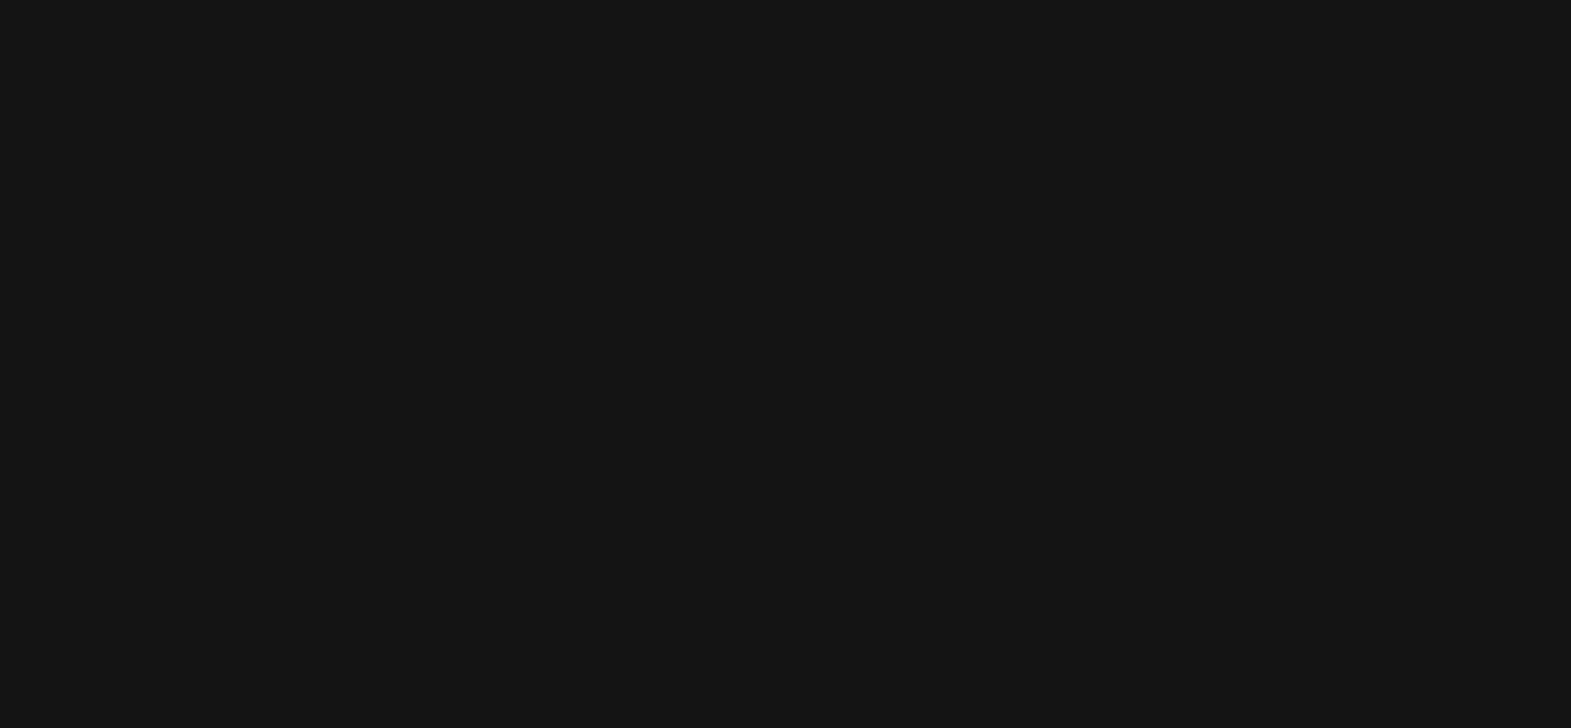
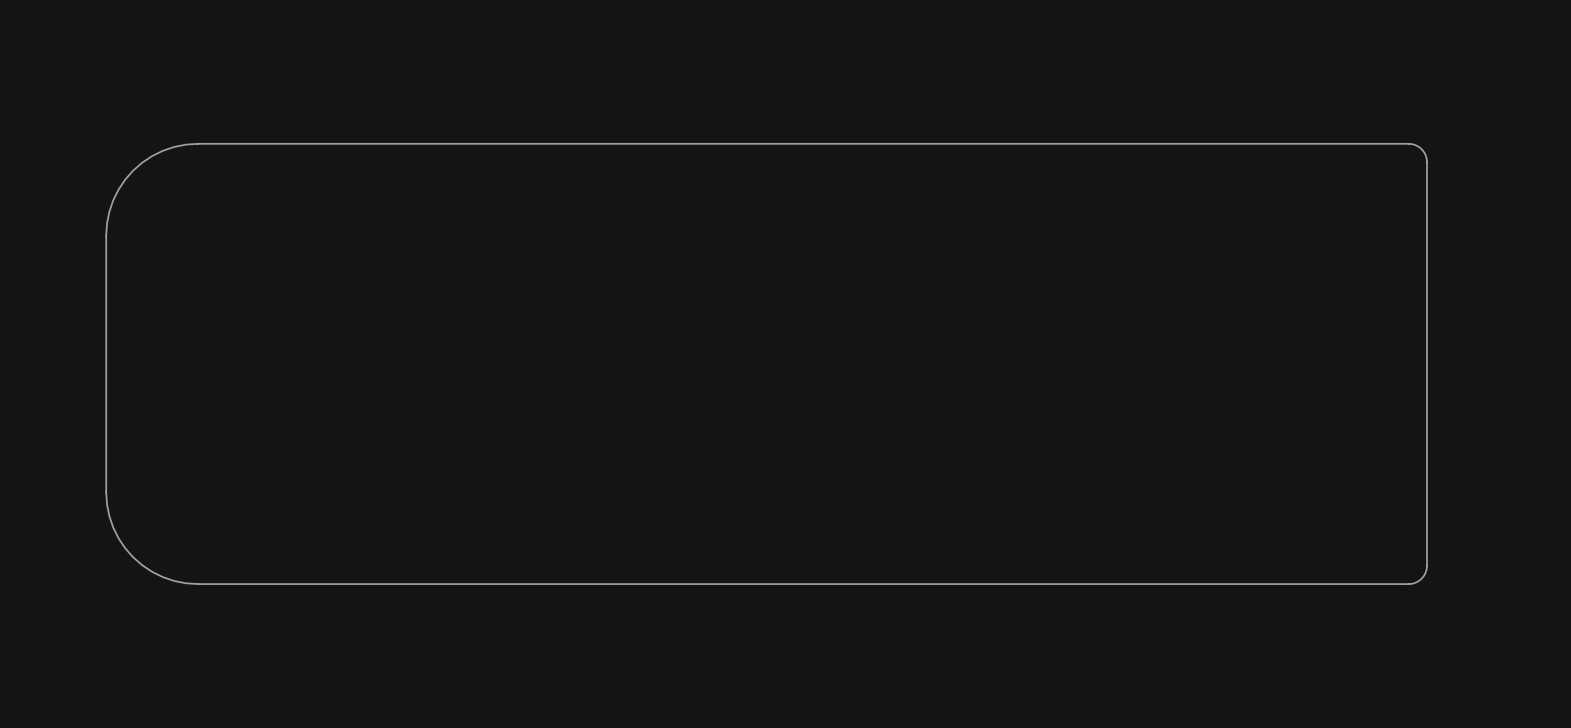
board edge: none -> (1408, 143) (197, 143) (174, 146) (152, 156) (133, 170) (118, 189) (113, 200) (107, 223) (106, 492) (109, 516) (118, 538) (133, 557) (142, 565) (162, 577) (185, 583) (197, 584) (1413, 583) (1423, 576) (1426, 565) (1426, 162) (1421, 149) (1408, 143)

